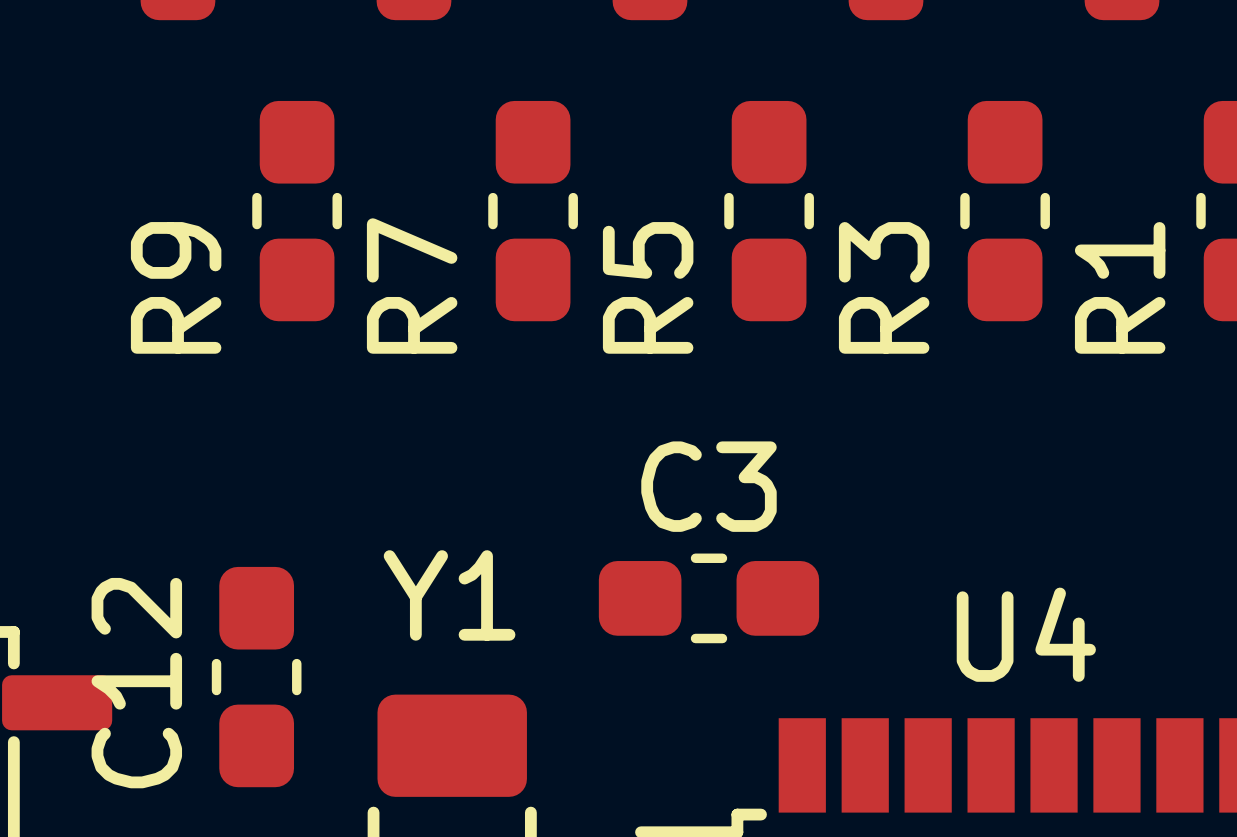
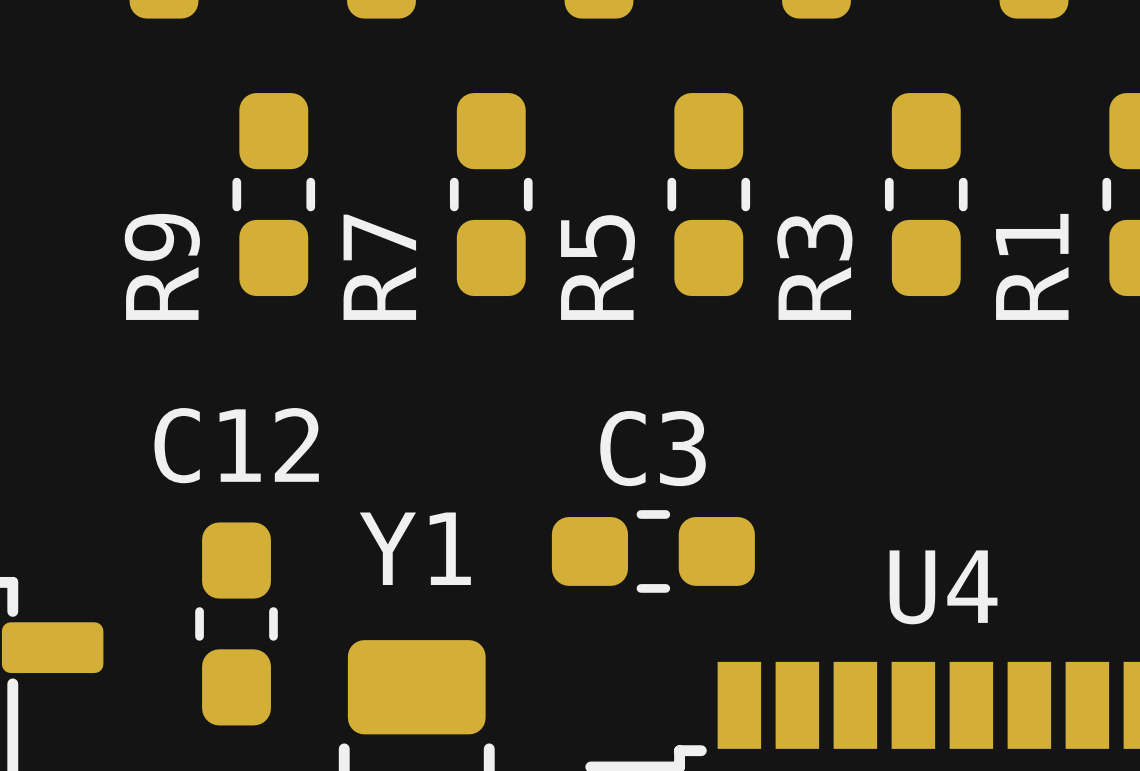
C12 name rotation: 0° (136, 683) -> 90° clockwise (236, 445)

